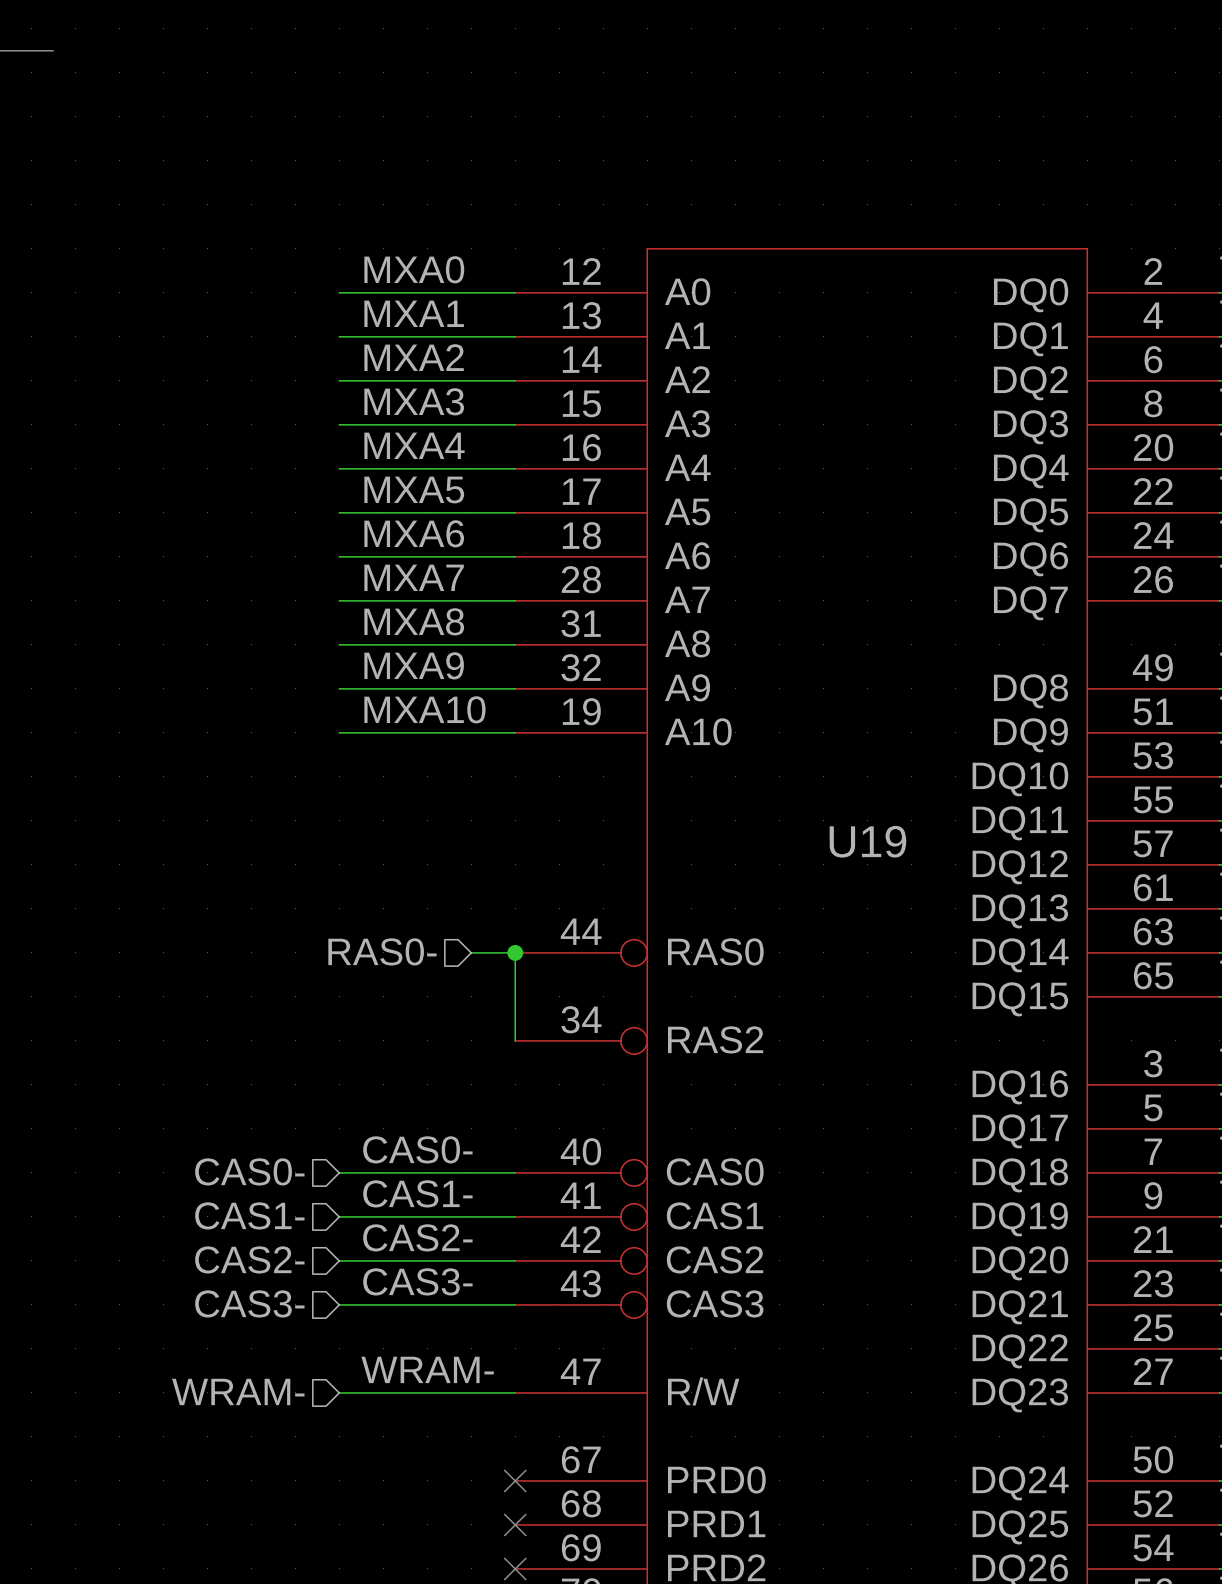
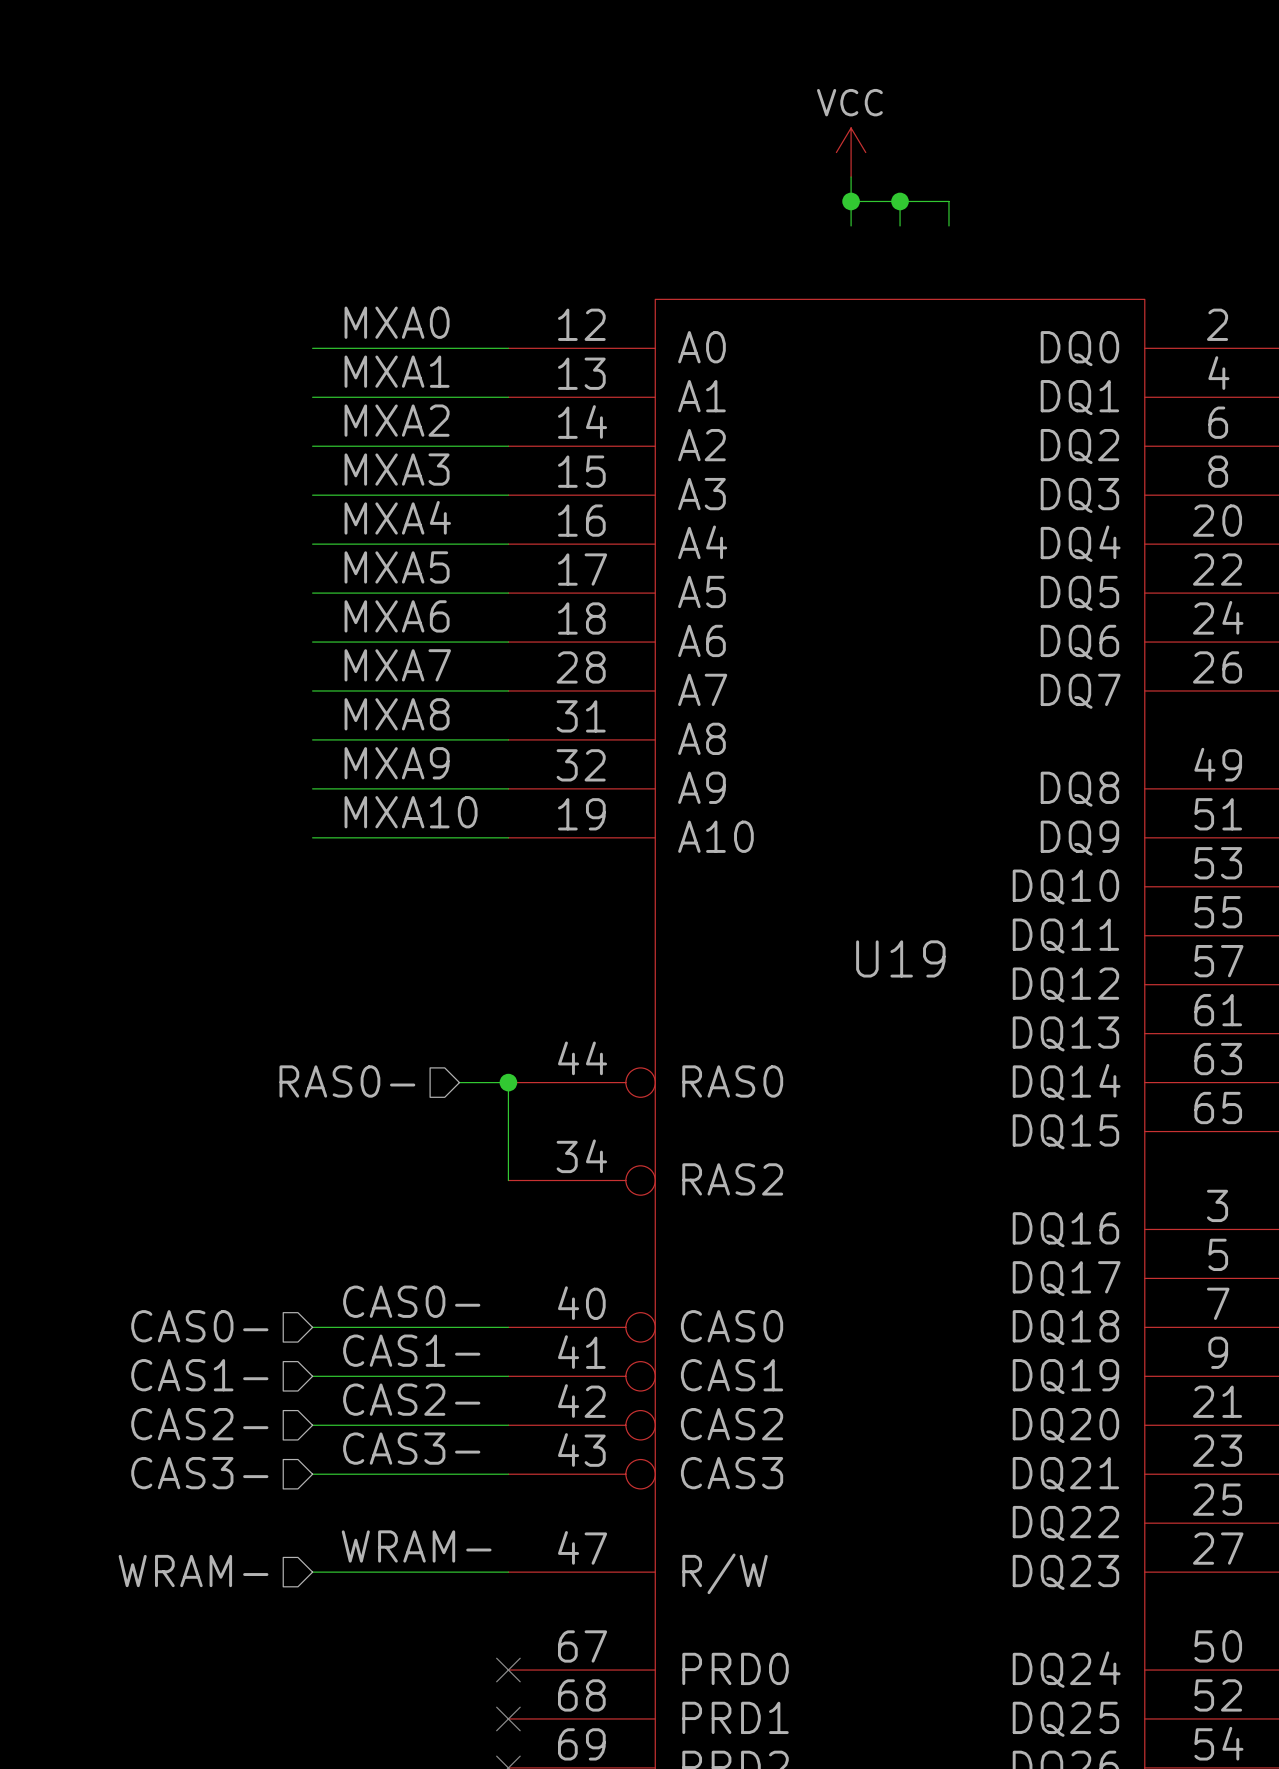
power symbol: none -> VCC (851, 152)
wire: none -> (851, 176) (851, 225)
wire: none -> (851, 201) (948, 201) (948, 225)
junction: none -> (851, 201)
wire: none -> (900, 201) (900, 225)
junction: none -> (900, 201)

